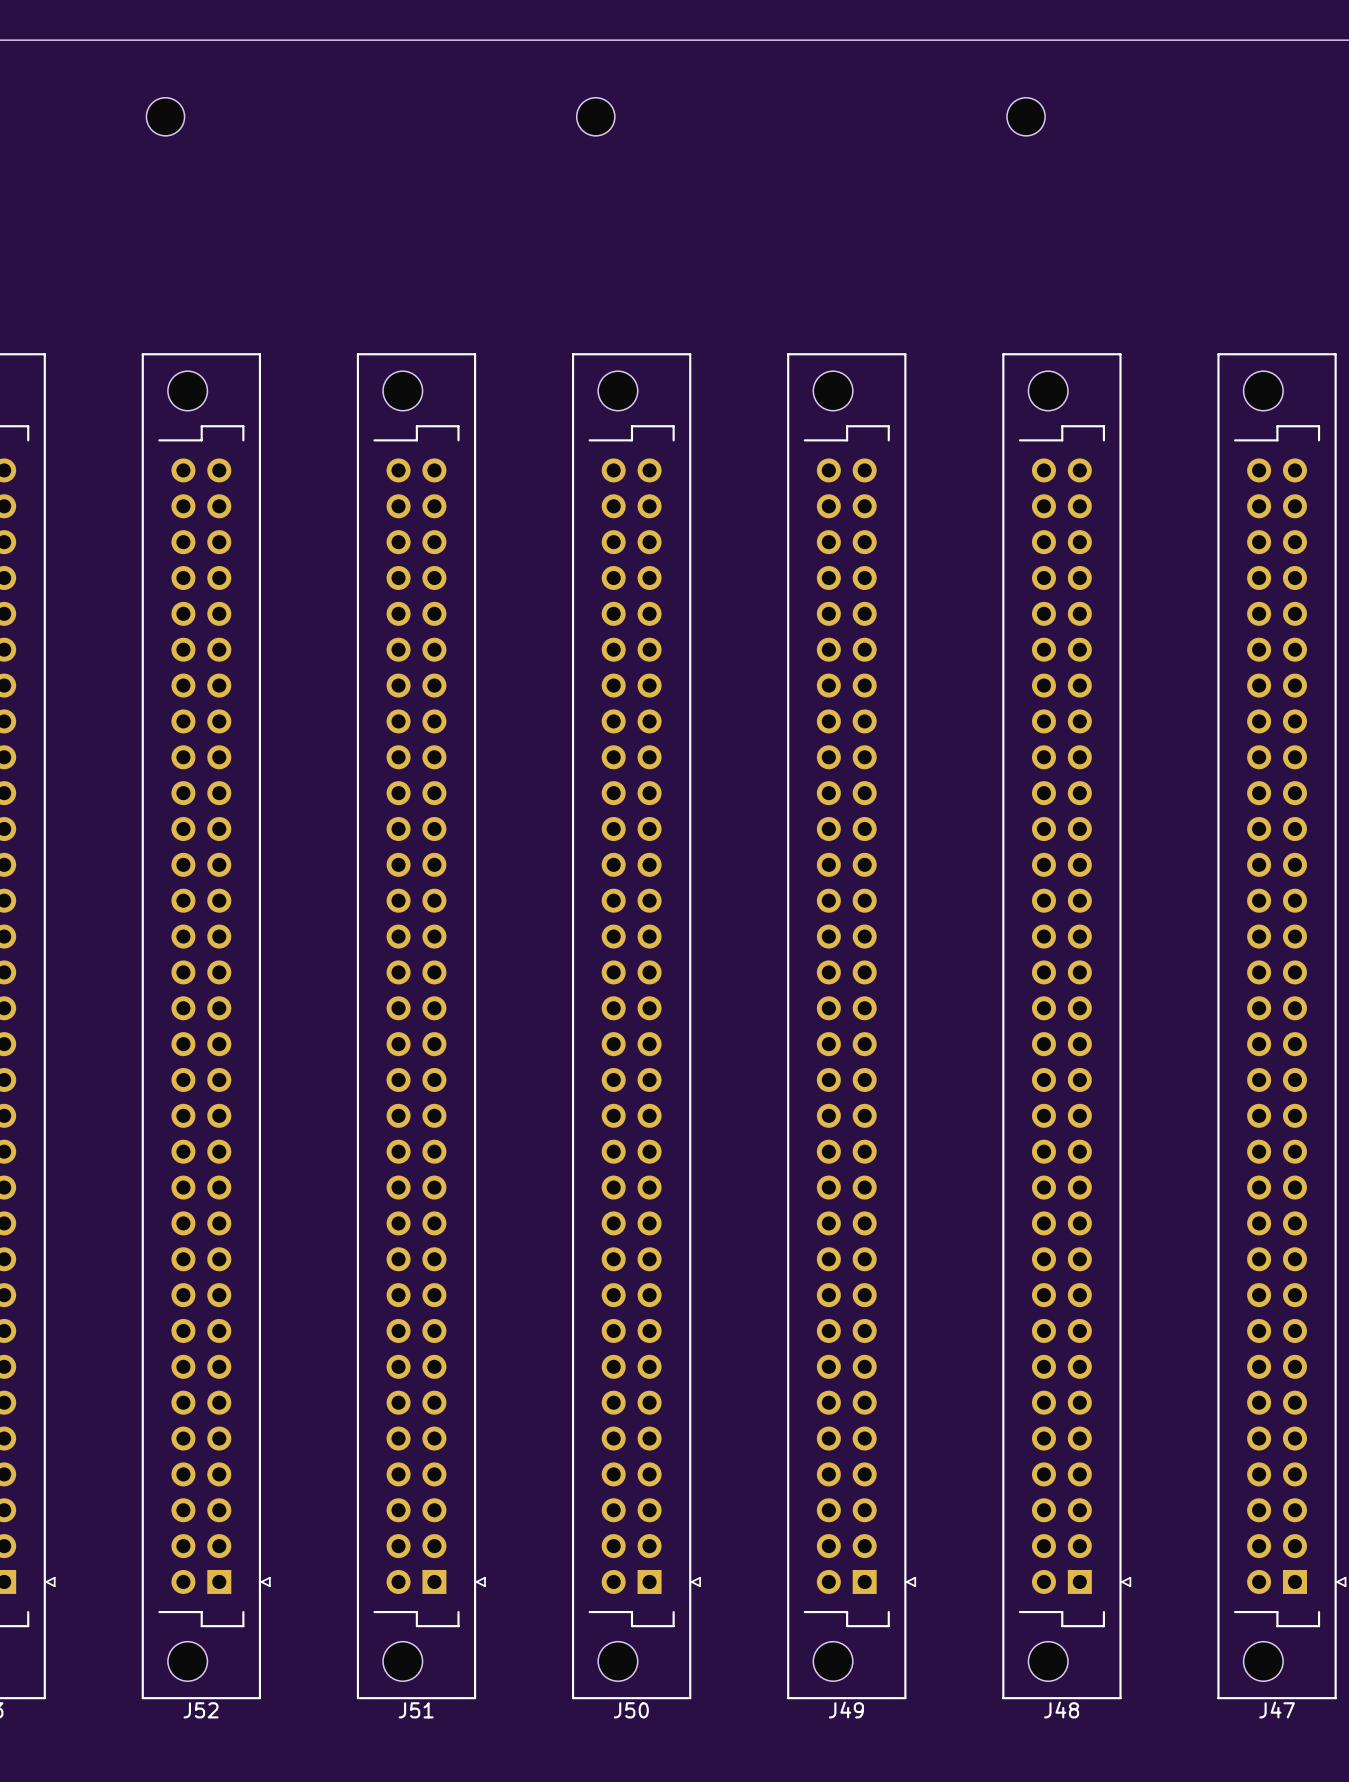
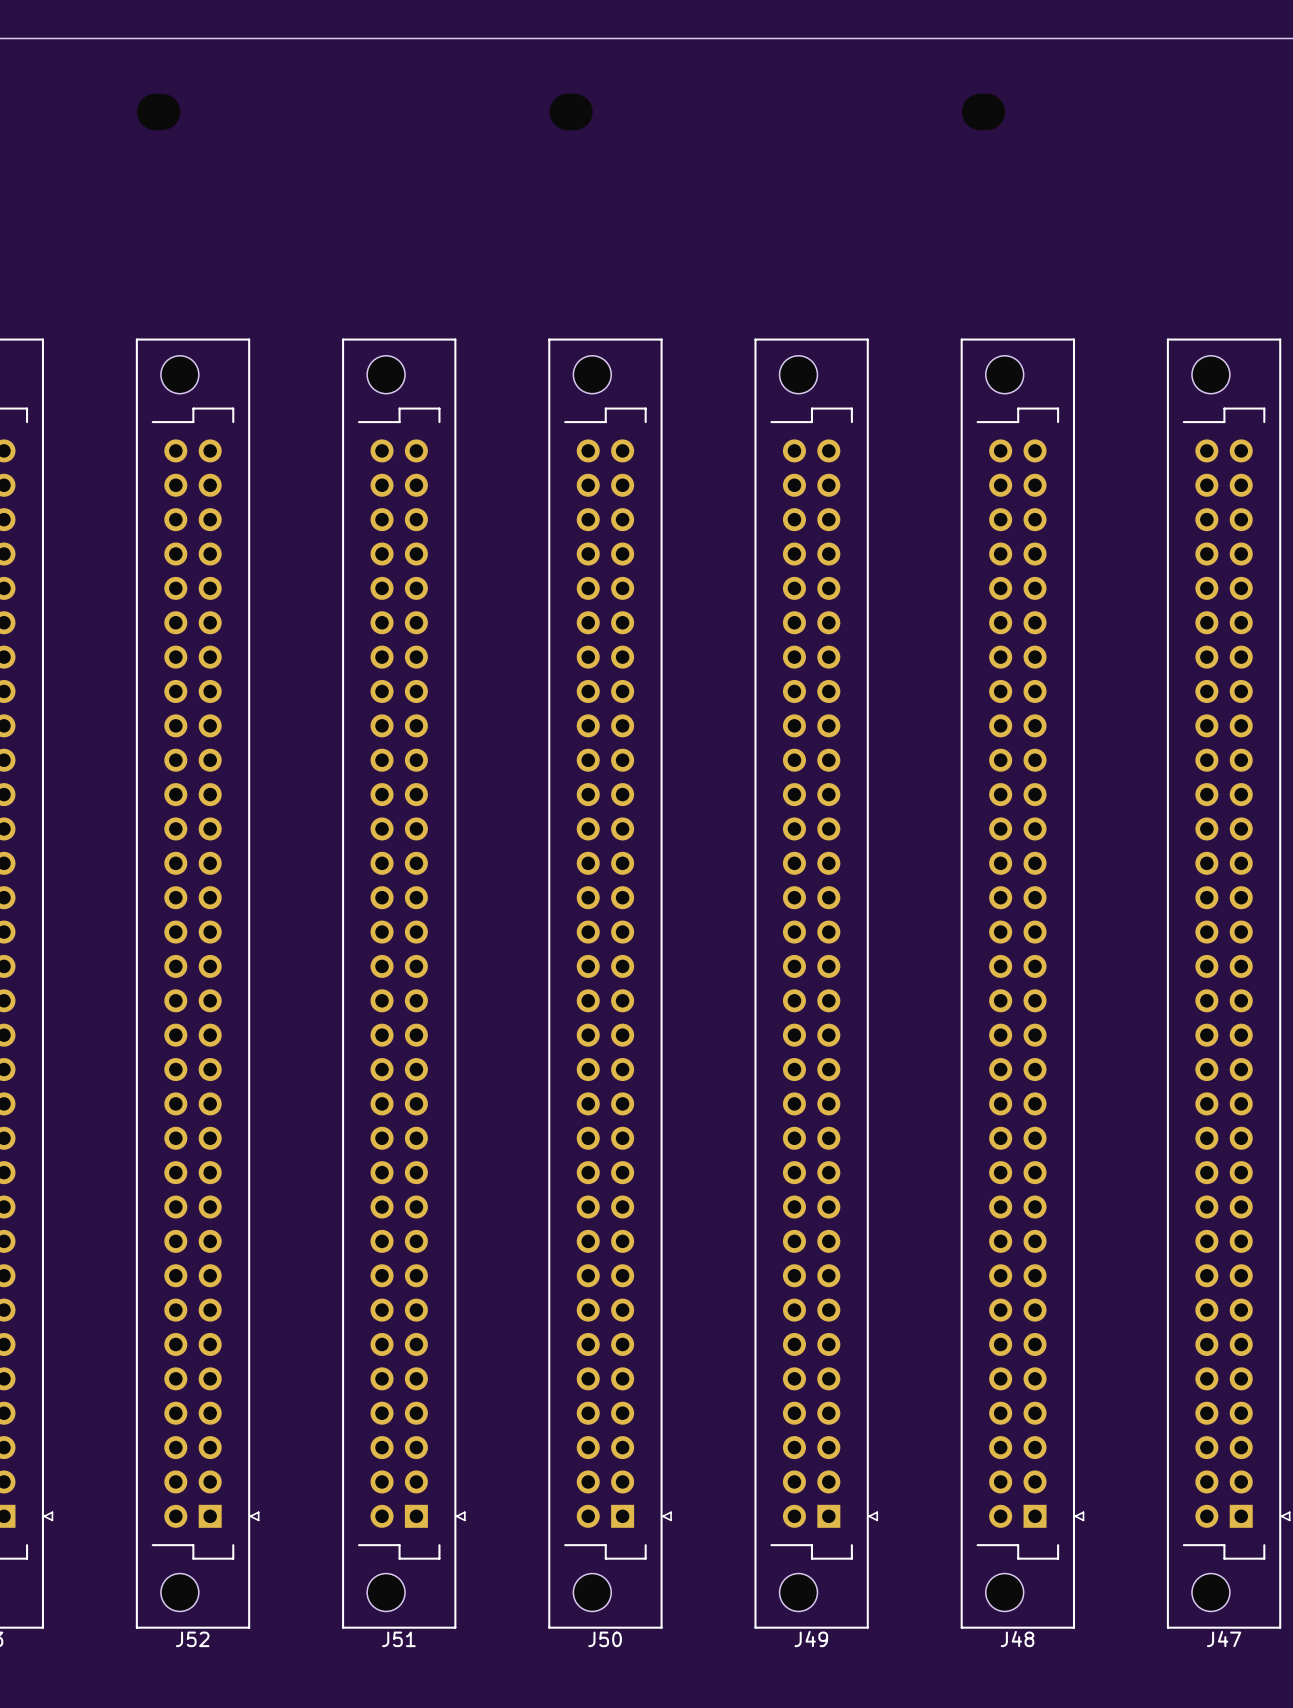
part footprint: [146, 97, 185, 136] -> [136, 93, 181, 131]
part footprint: [576, 97, 615, 136] -> [549, 93, 593, 131]
part footprint: [1007, 97, 1046, 136] -> [961, 93, 1006, 131]

